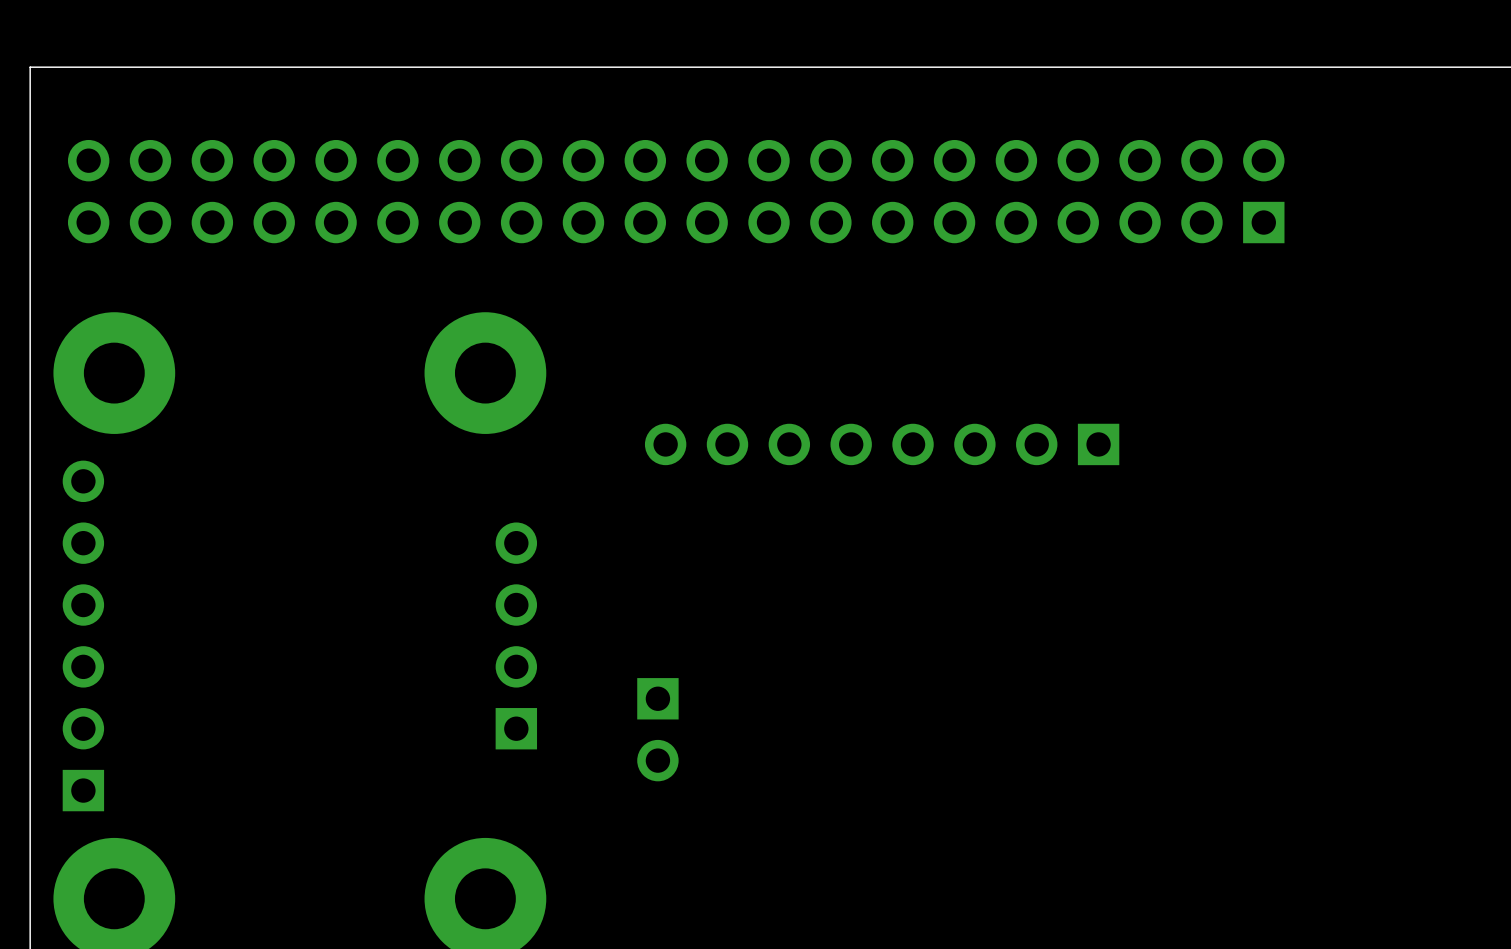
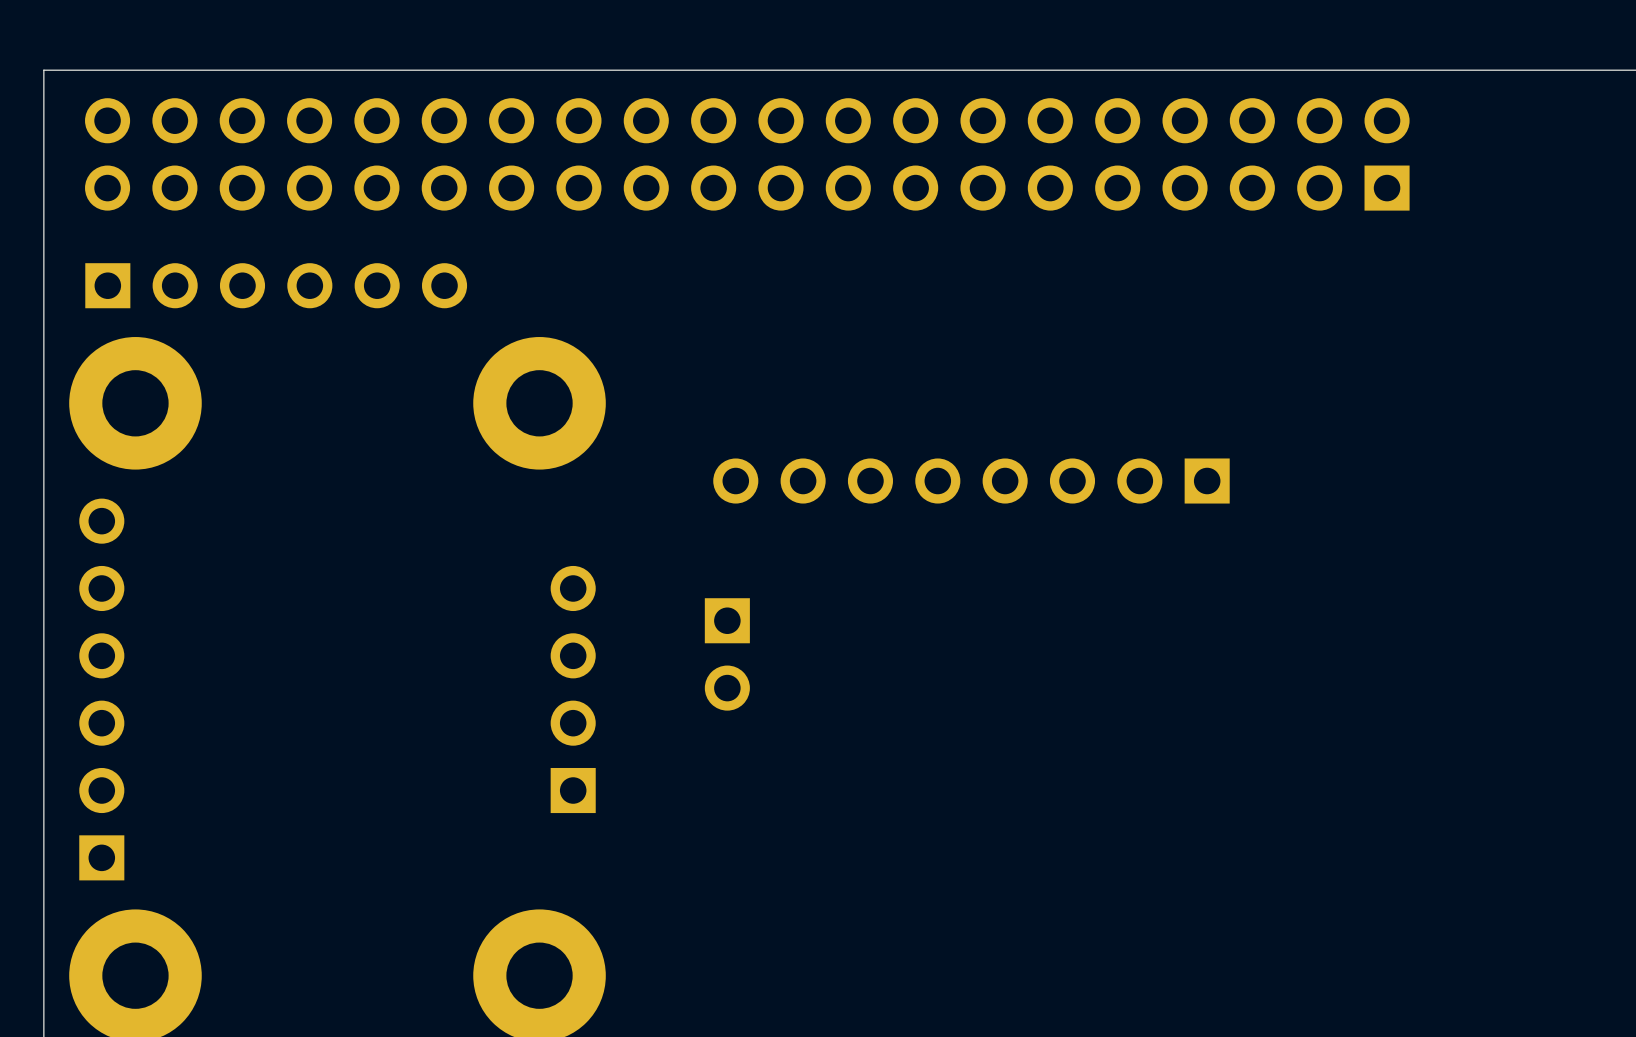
part position: (676, 191) -> (747, 154)
part: none -> (276, 285)
part position: (657, 729) -> (727, 654)

